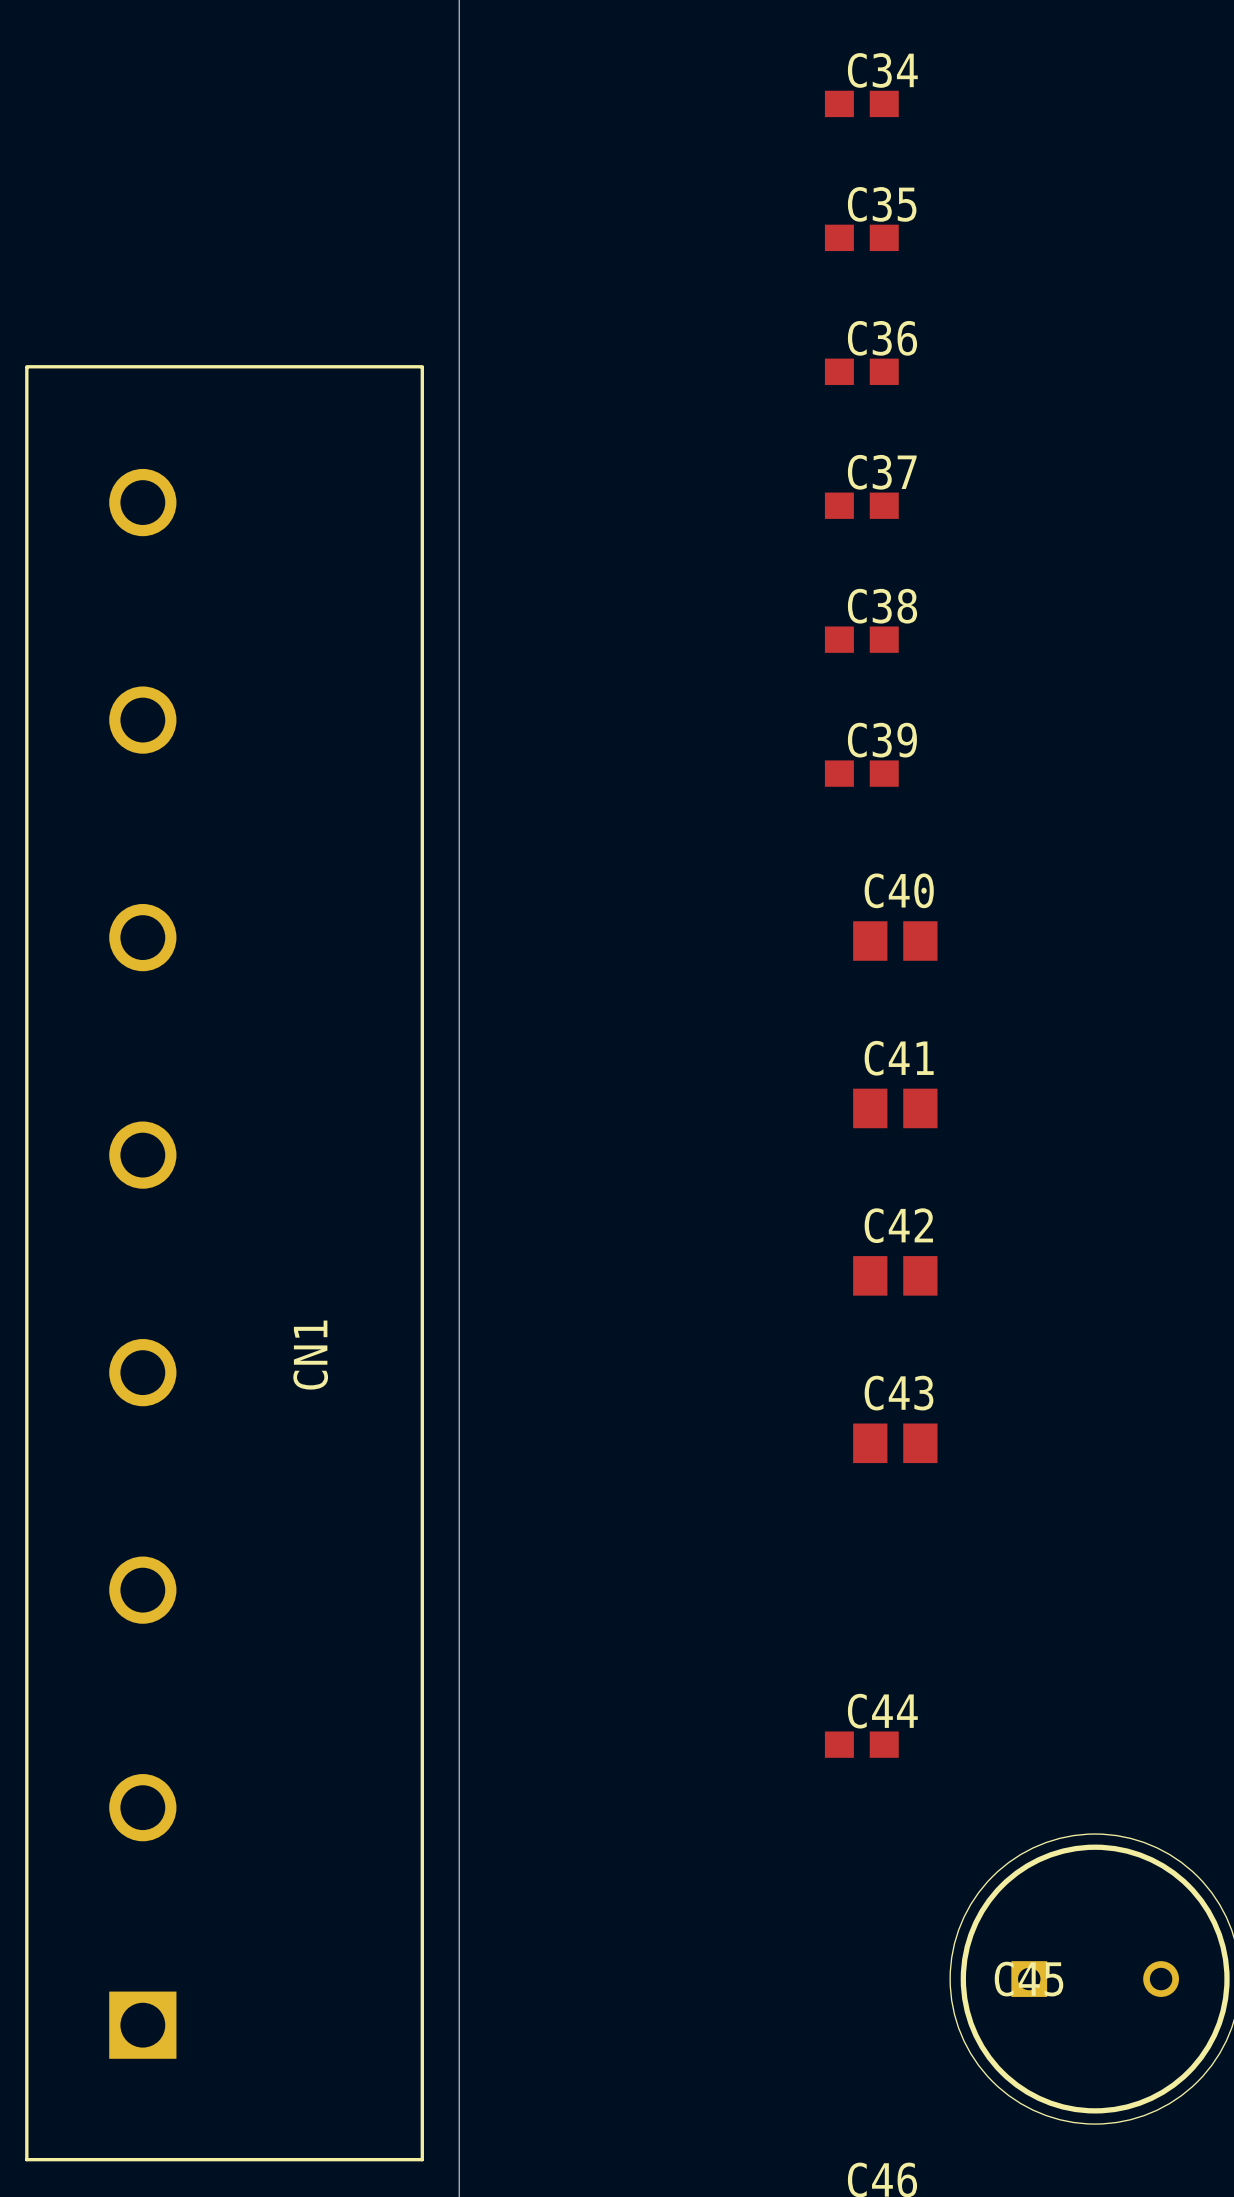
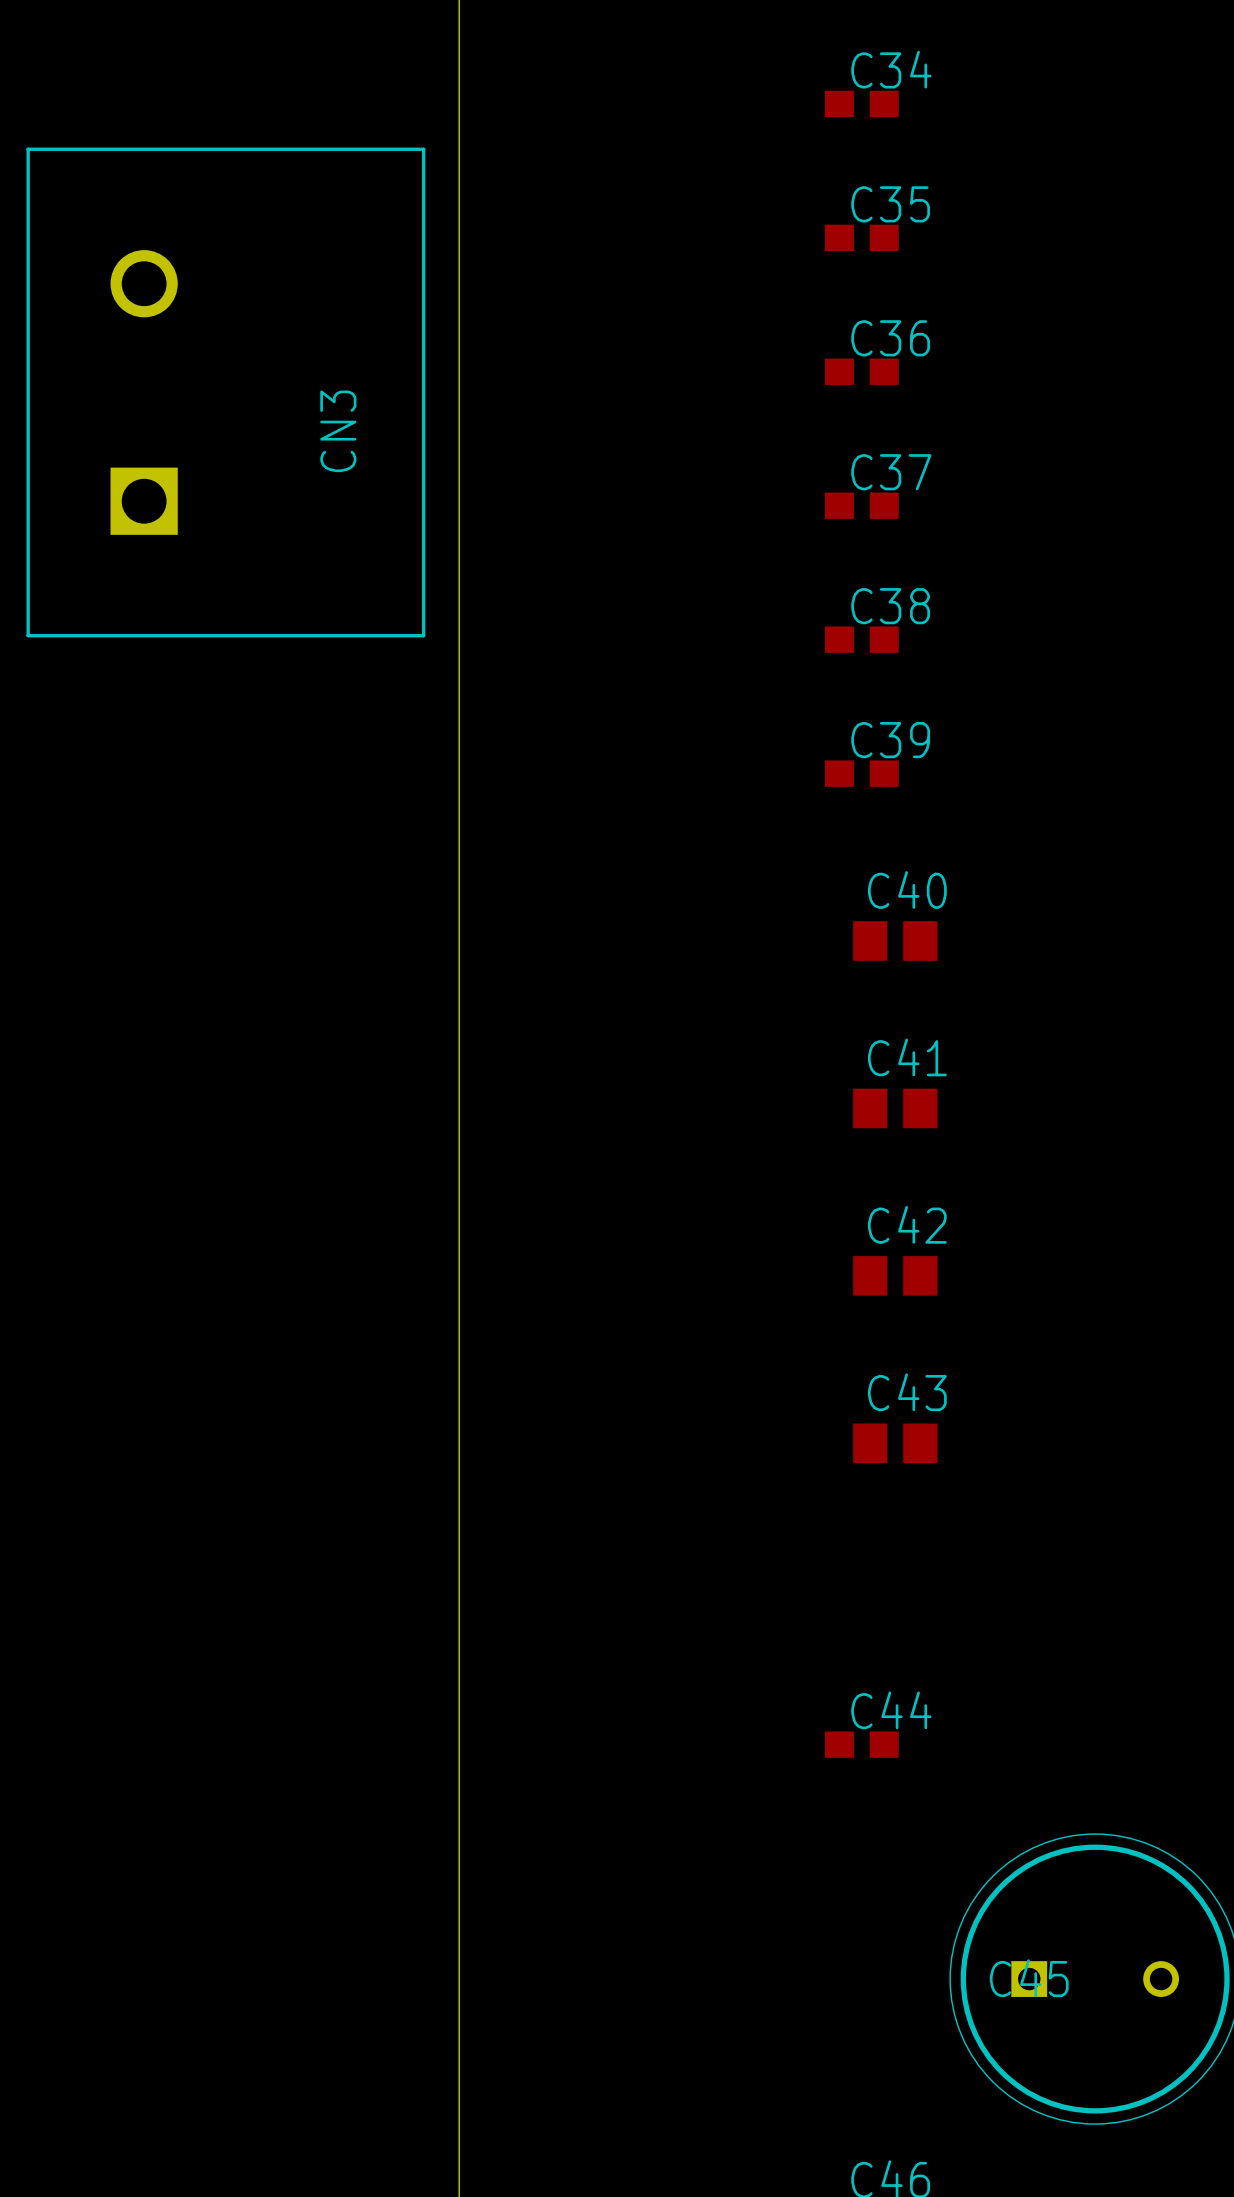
CN3: none -> (225, 392)
CN1: (224, 1263) -> none

